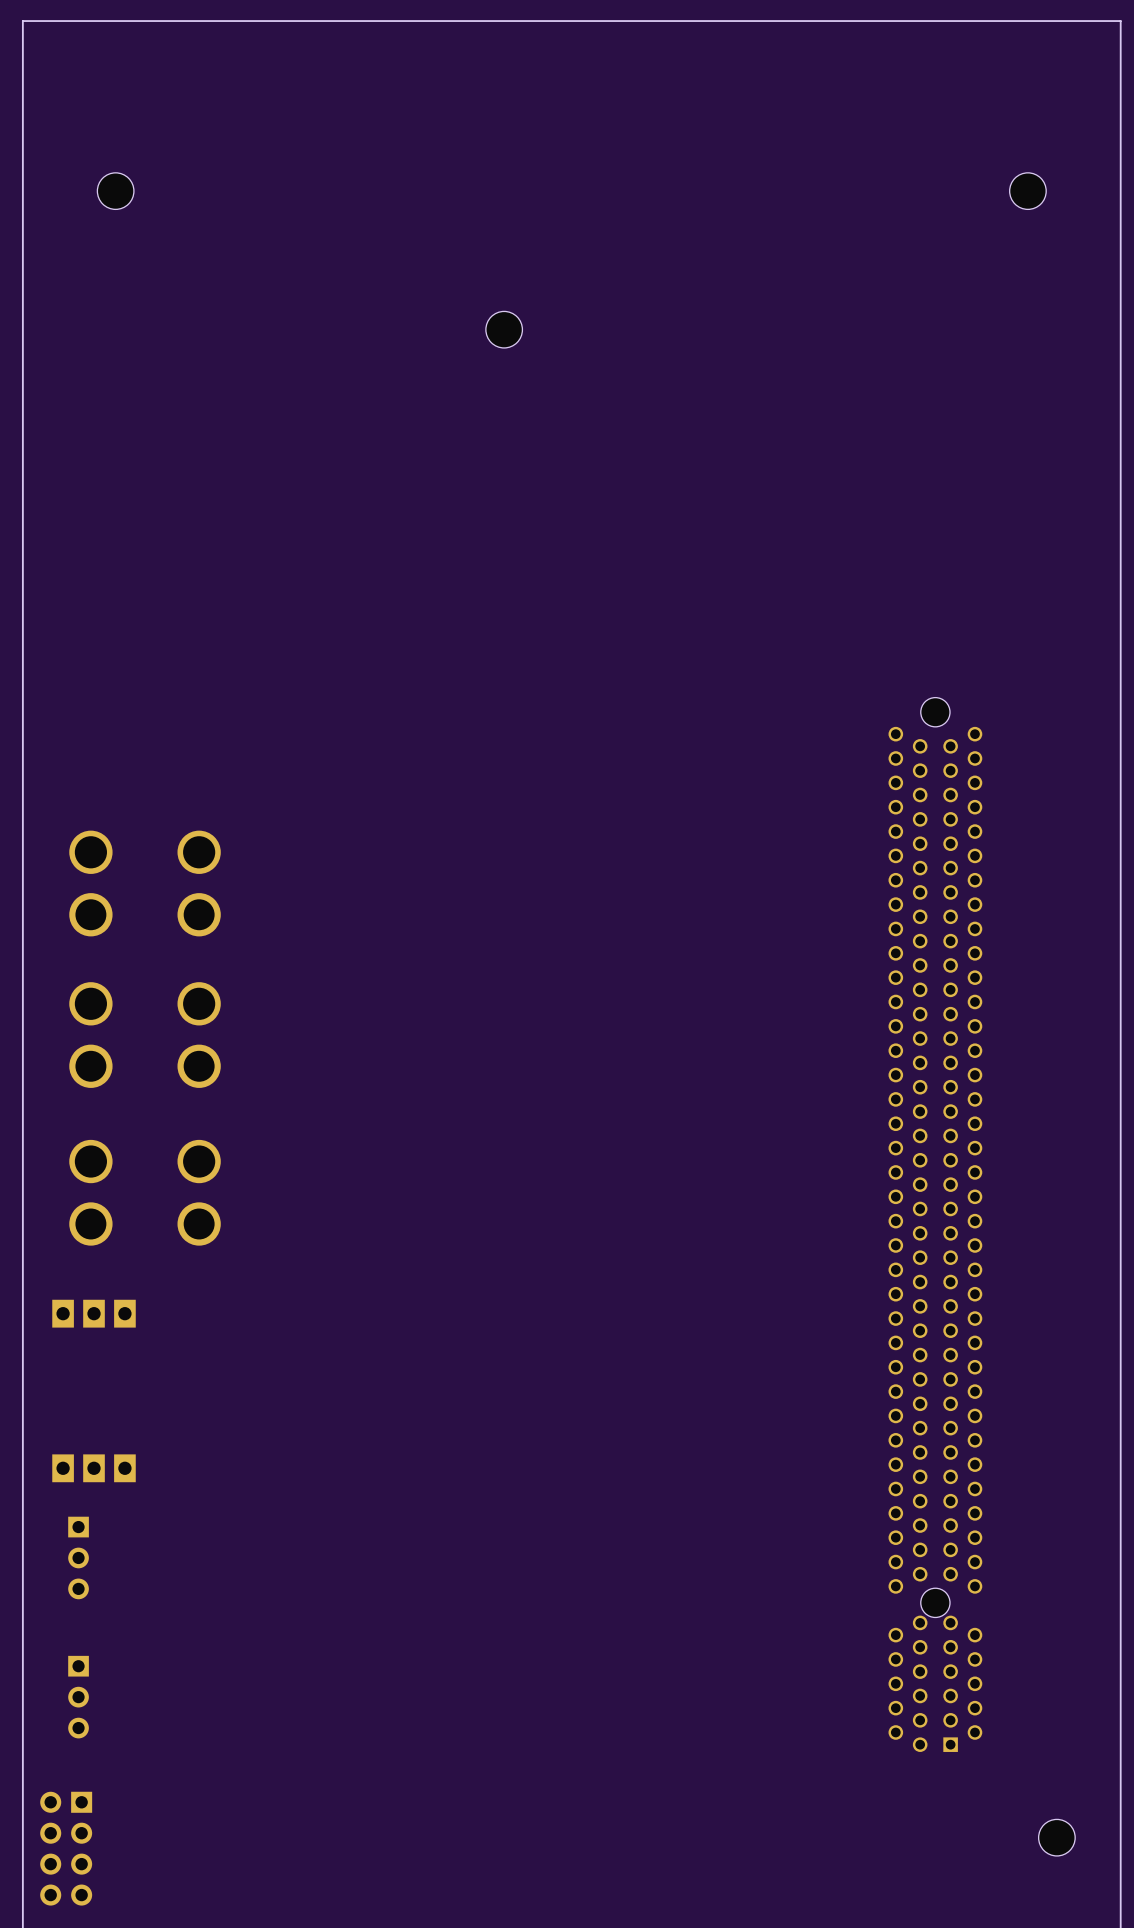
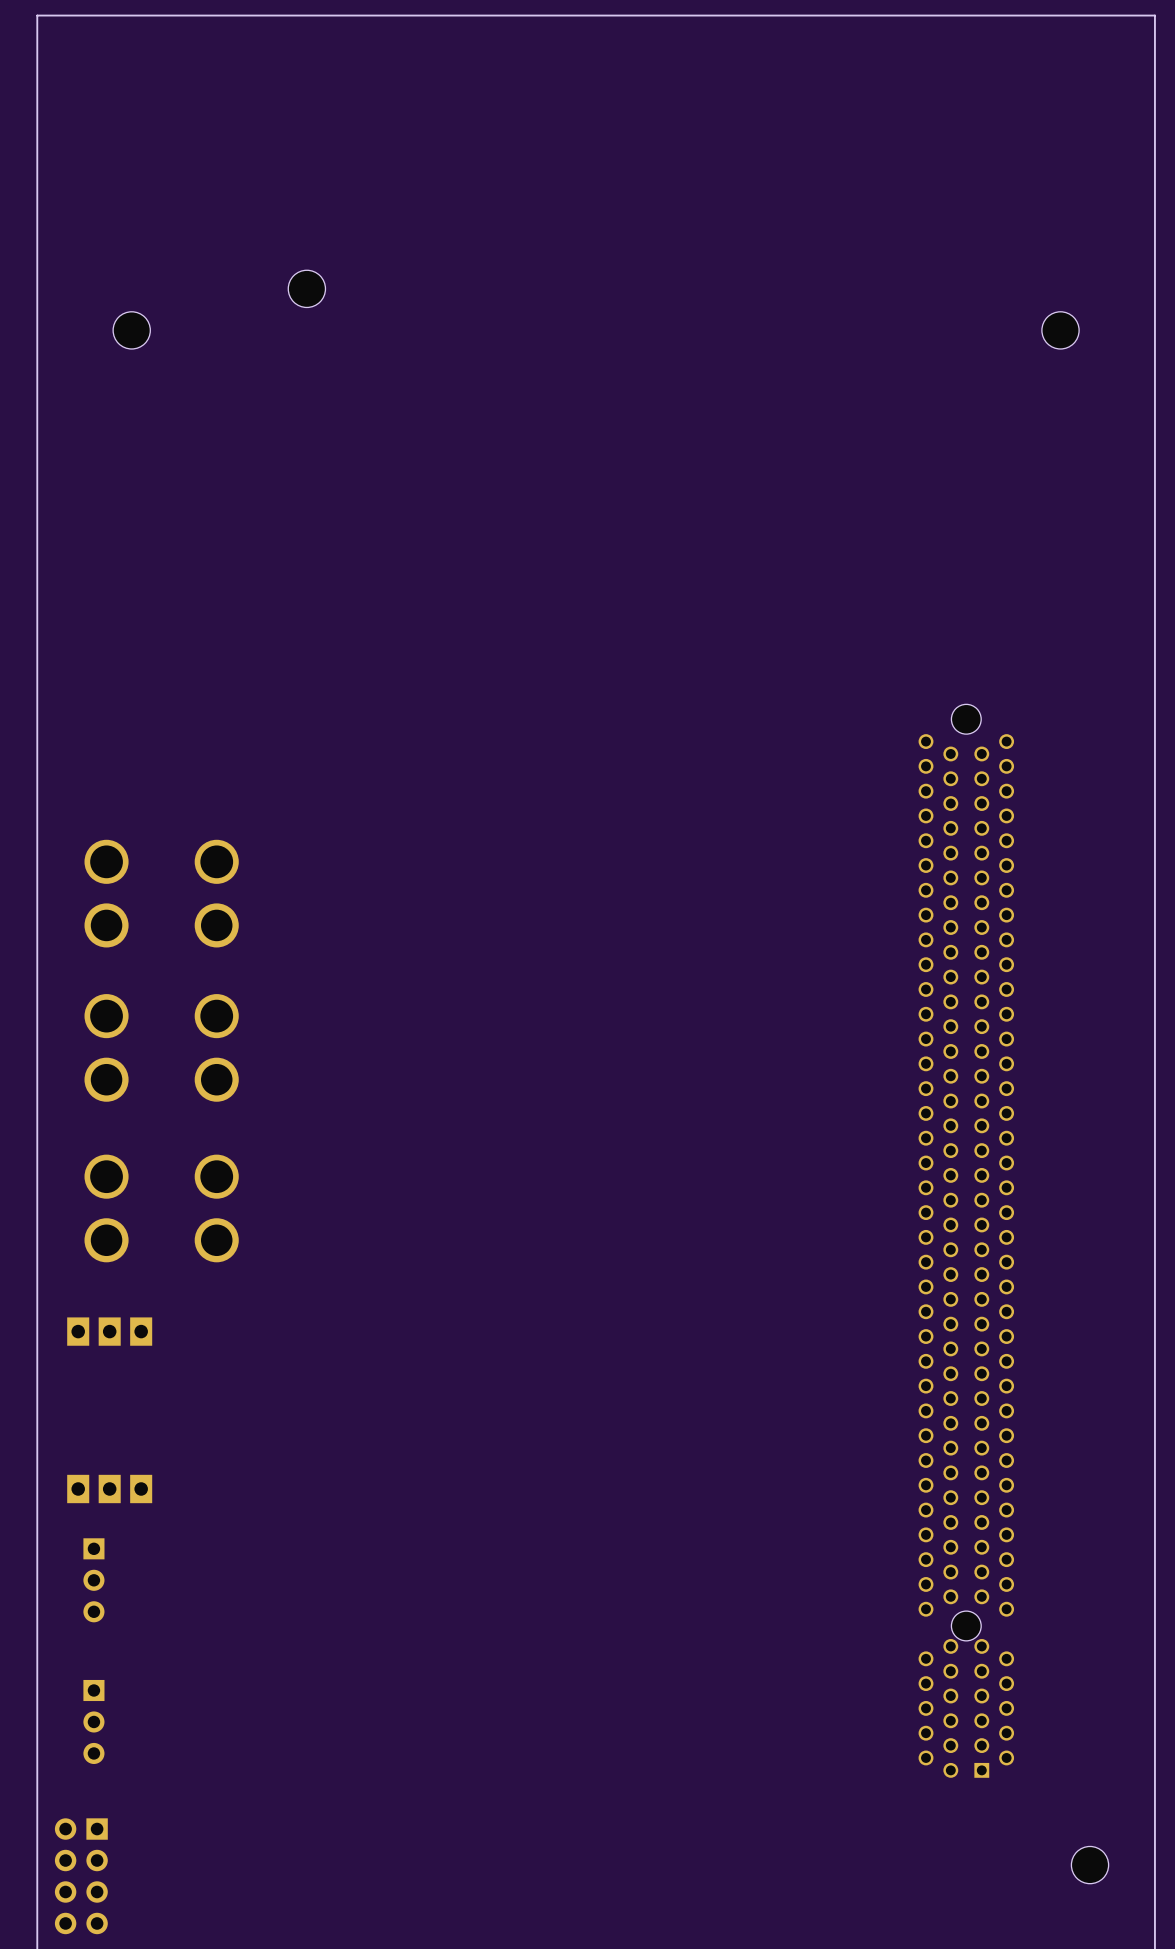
part: (115, 191) -> none
part position: (1027, 191) -> (1060, 330)
part: none -> (306, 288)
part: (504, 329) -> none
part: none -> (131, 330)

